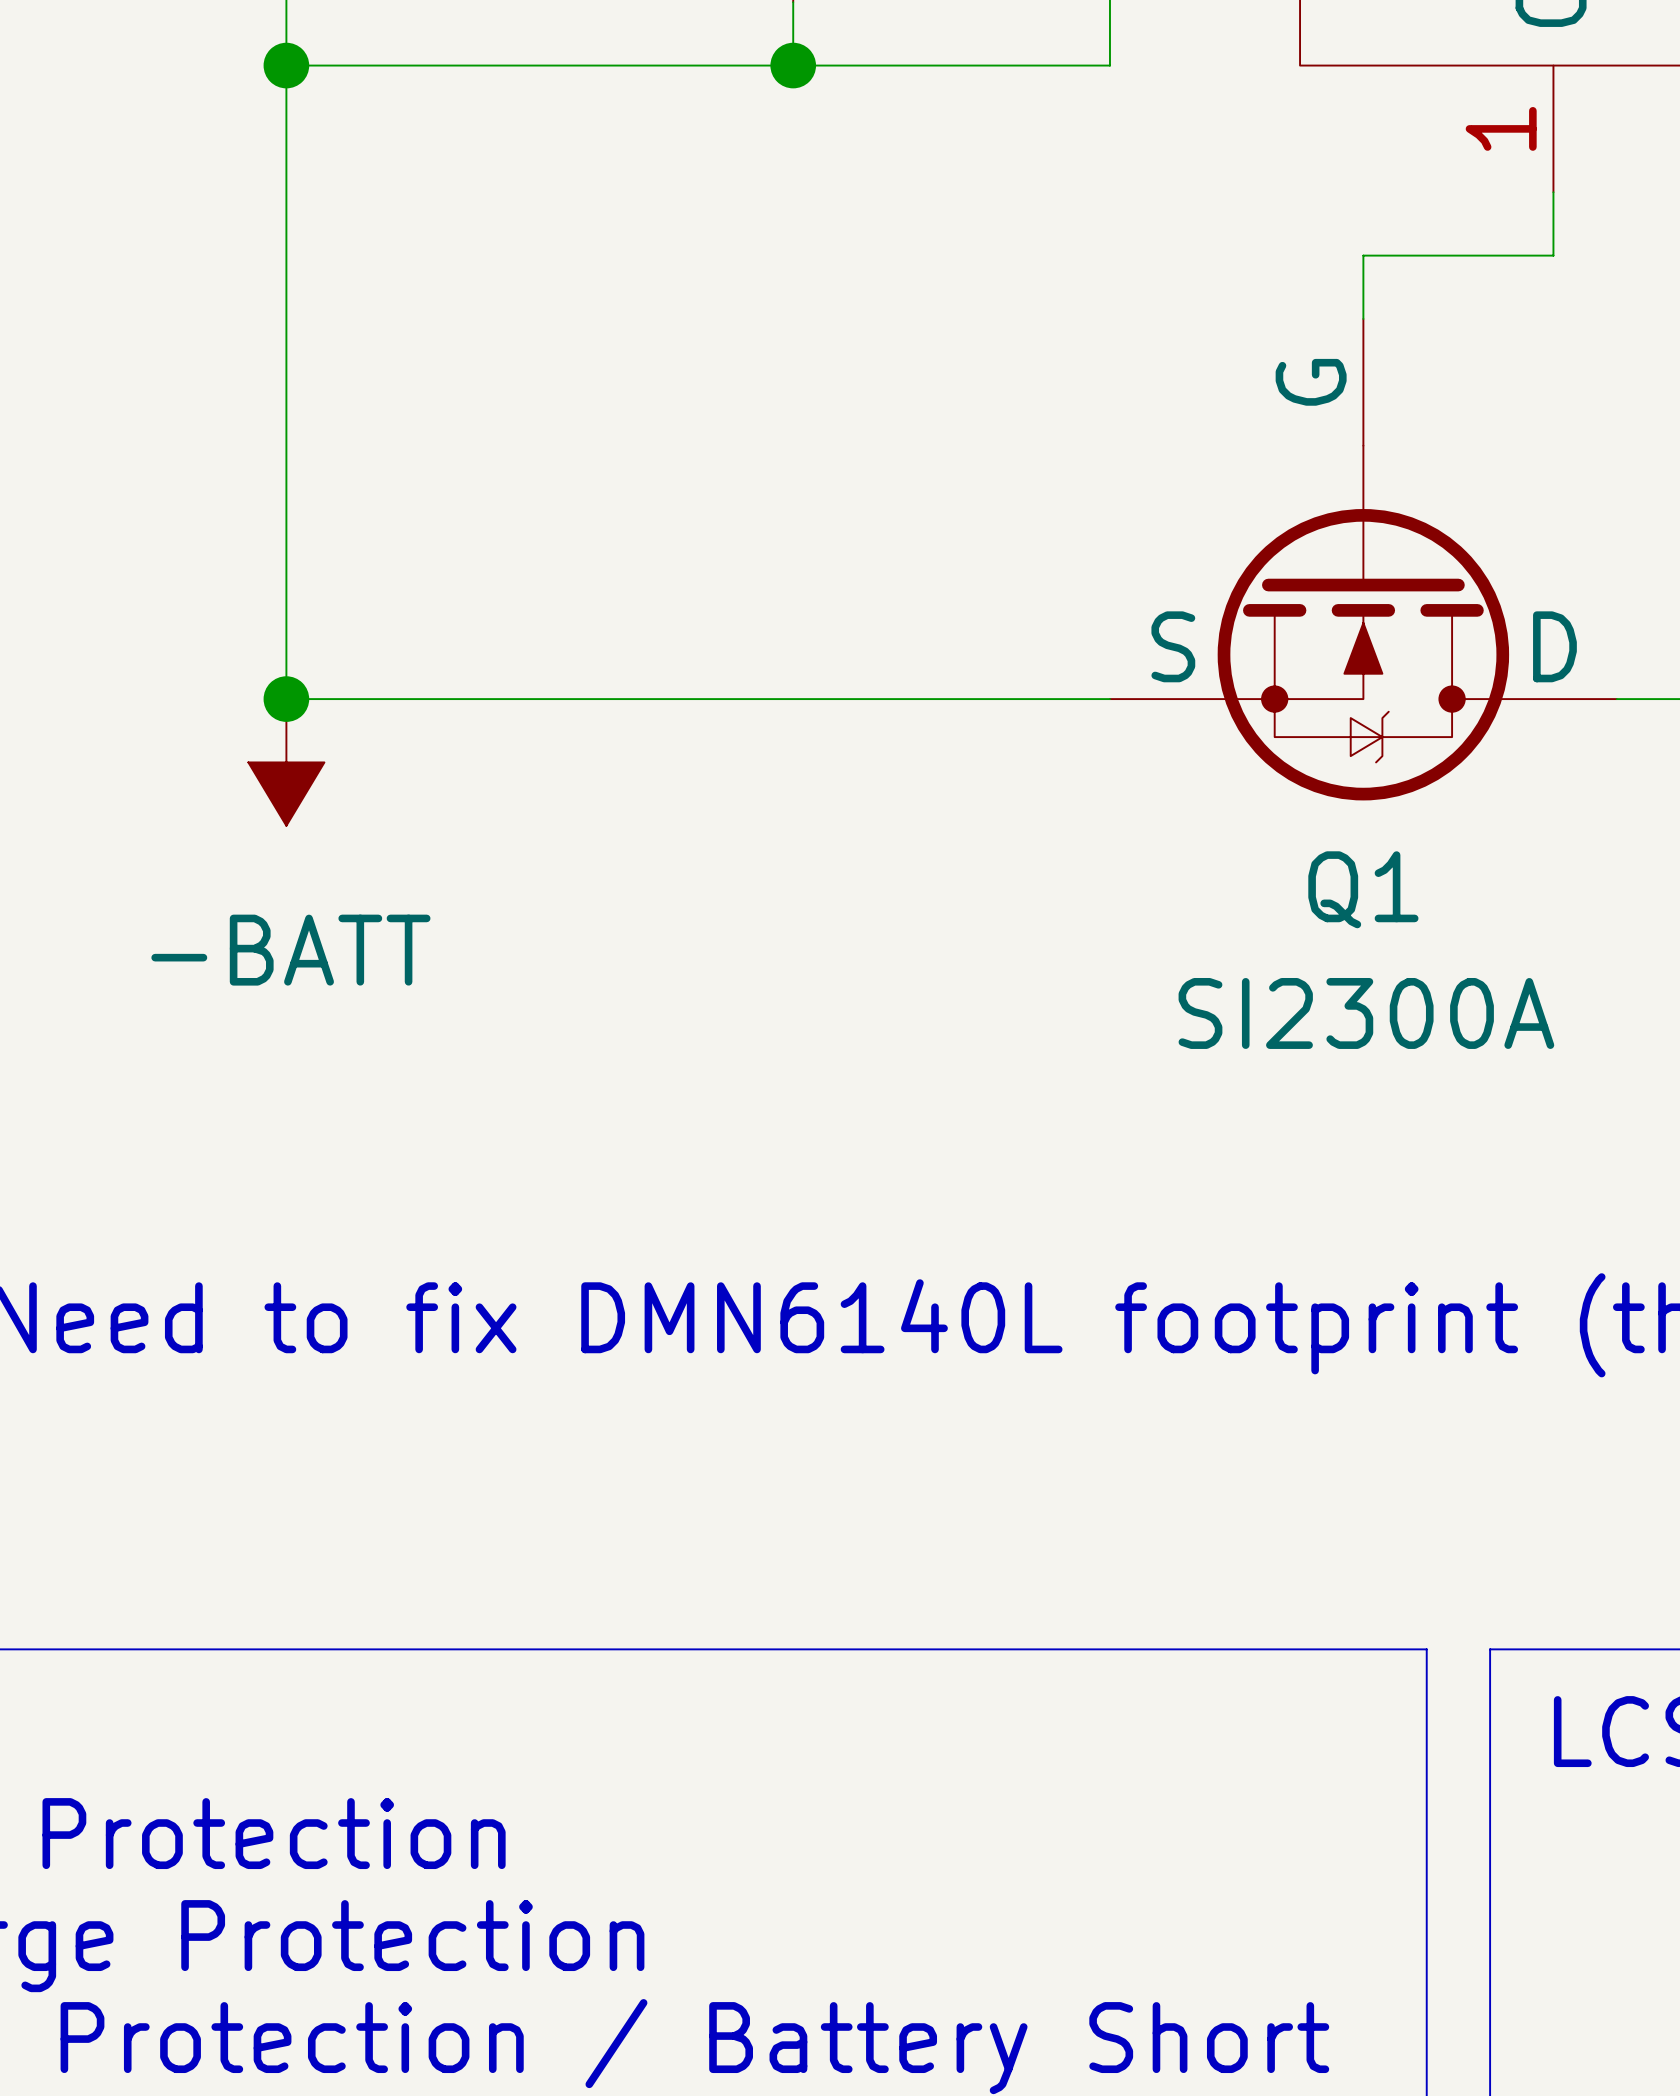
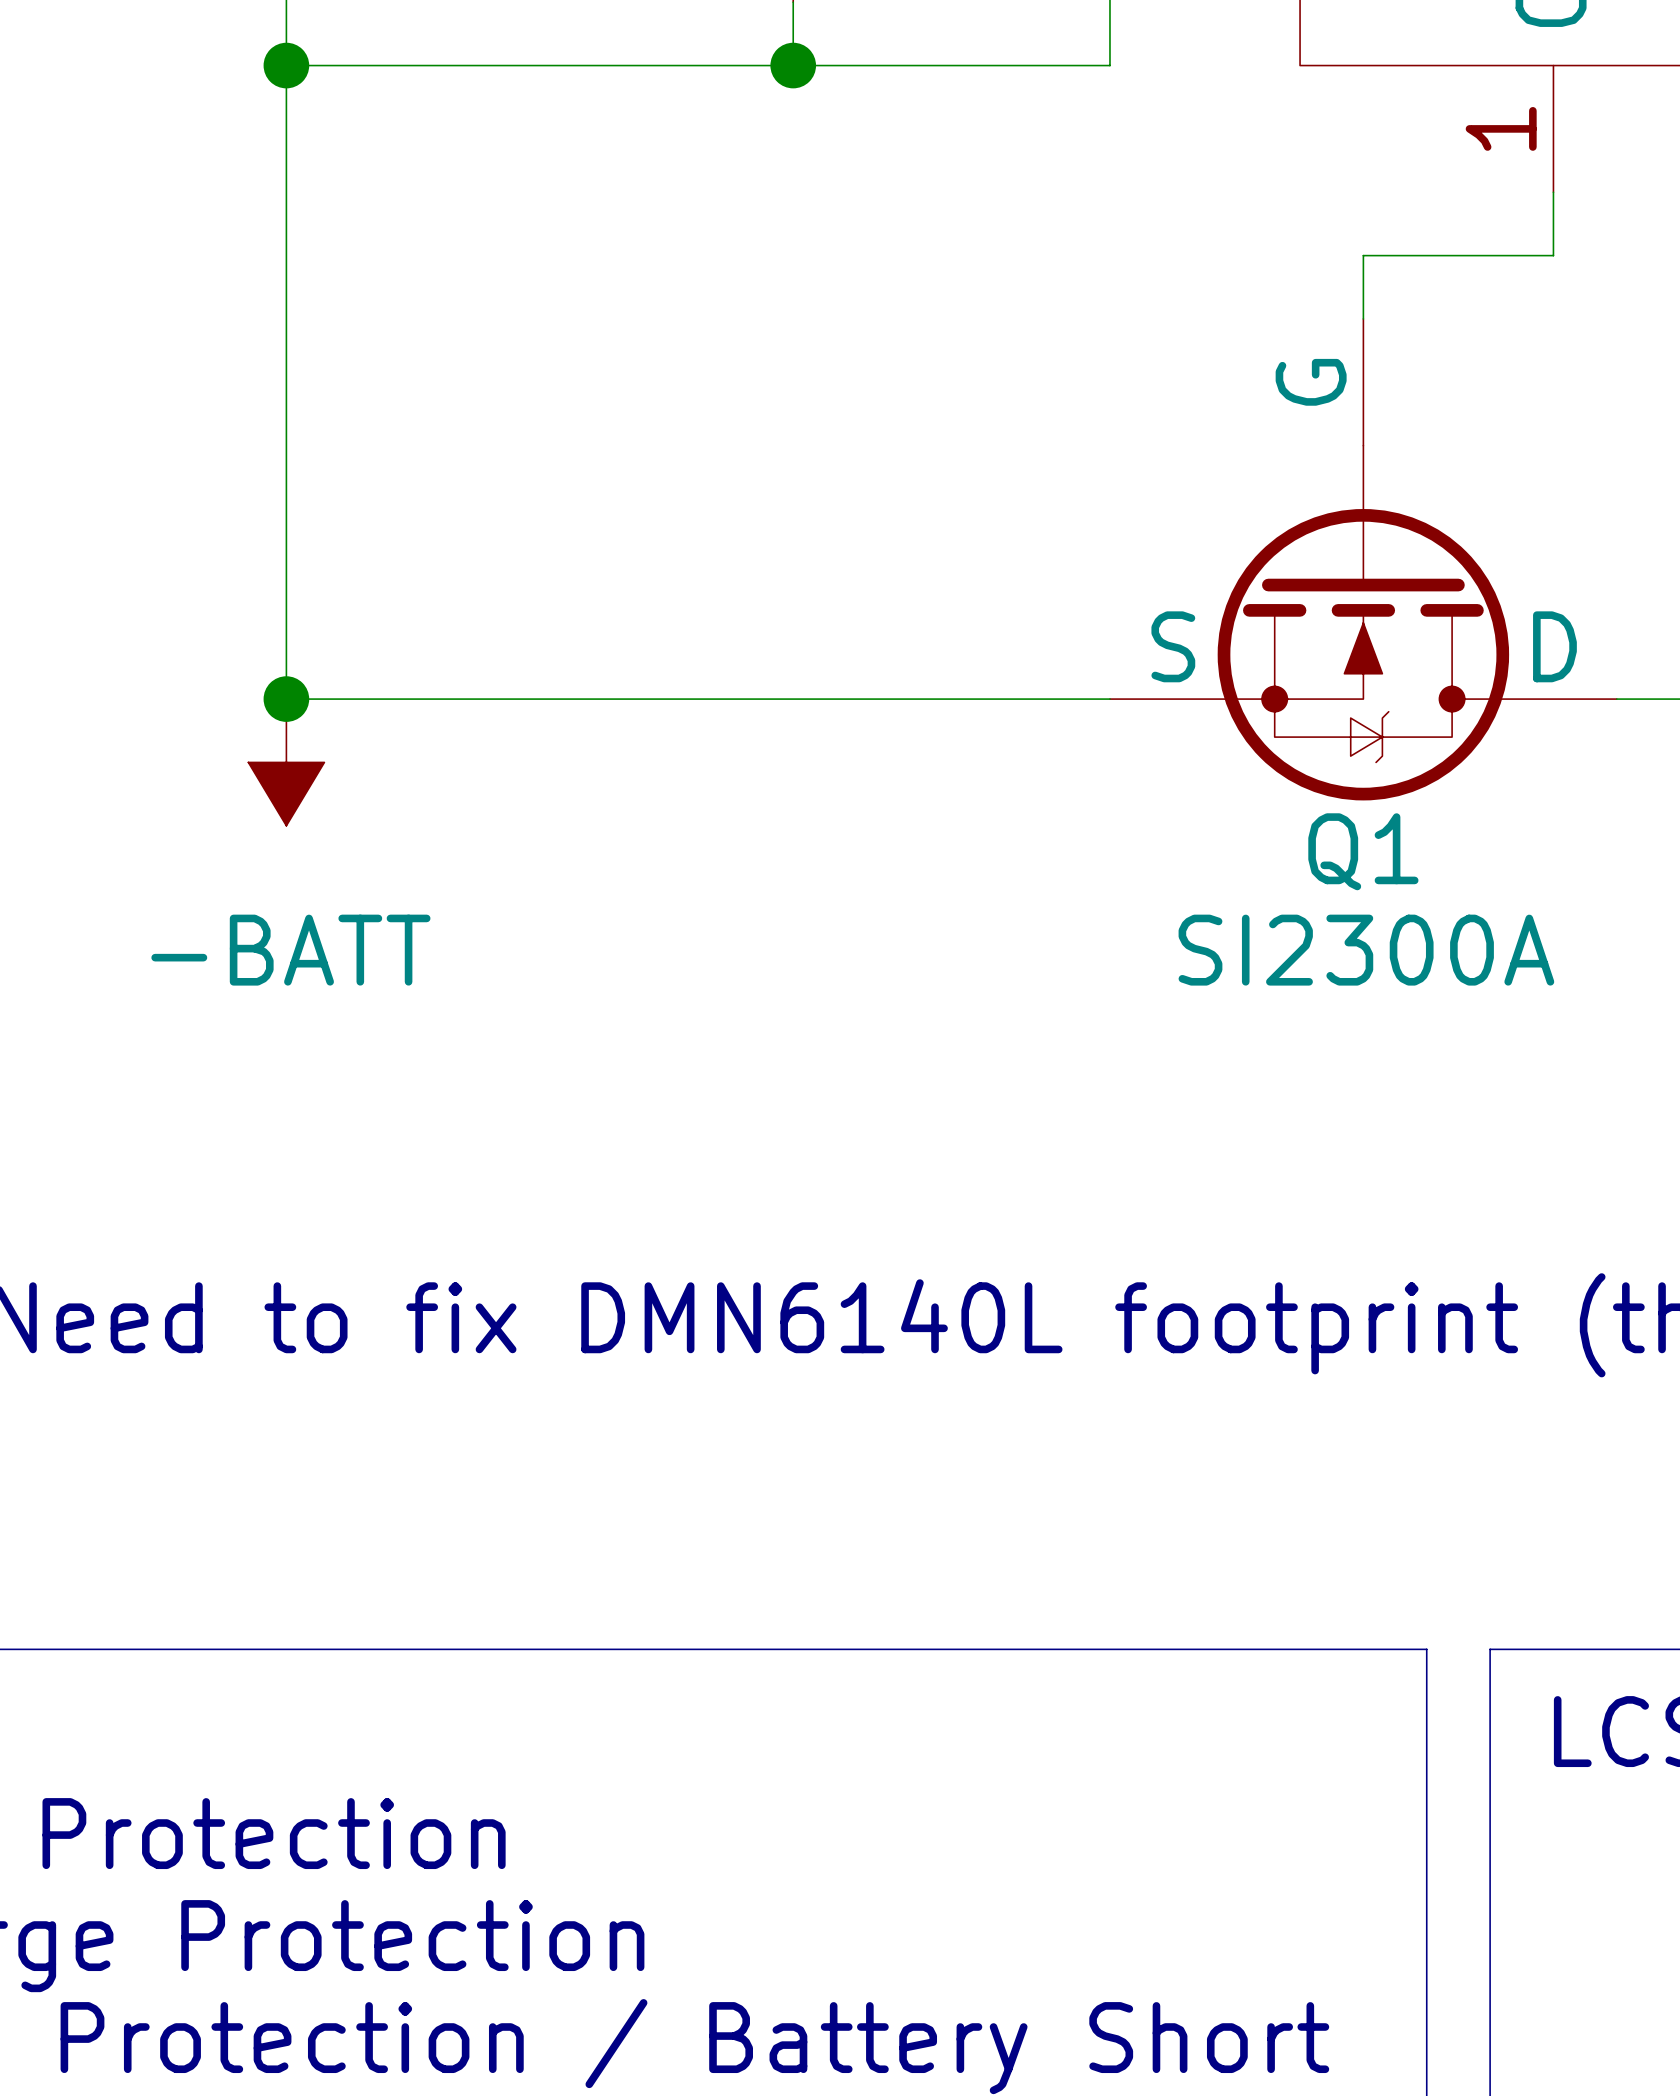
Q1 name position: Q1 (1363, 889) -> Q1 (1363, 851)
Q1 value position: SI2300A (1366, 1013) -> SI2300A (1366, 950)

